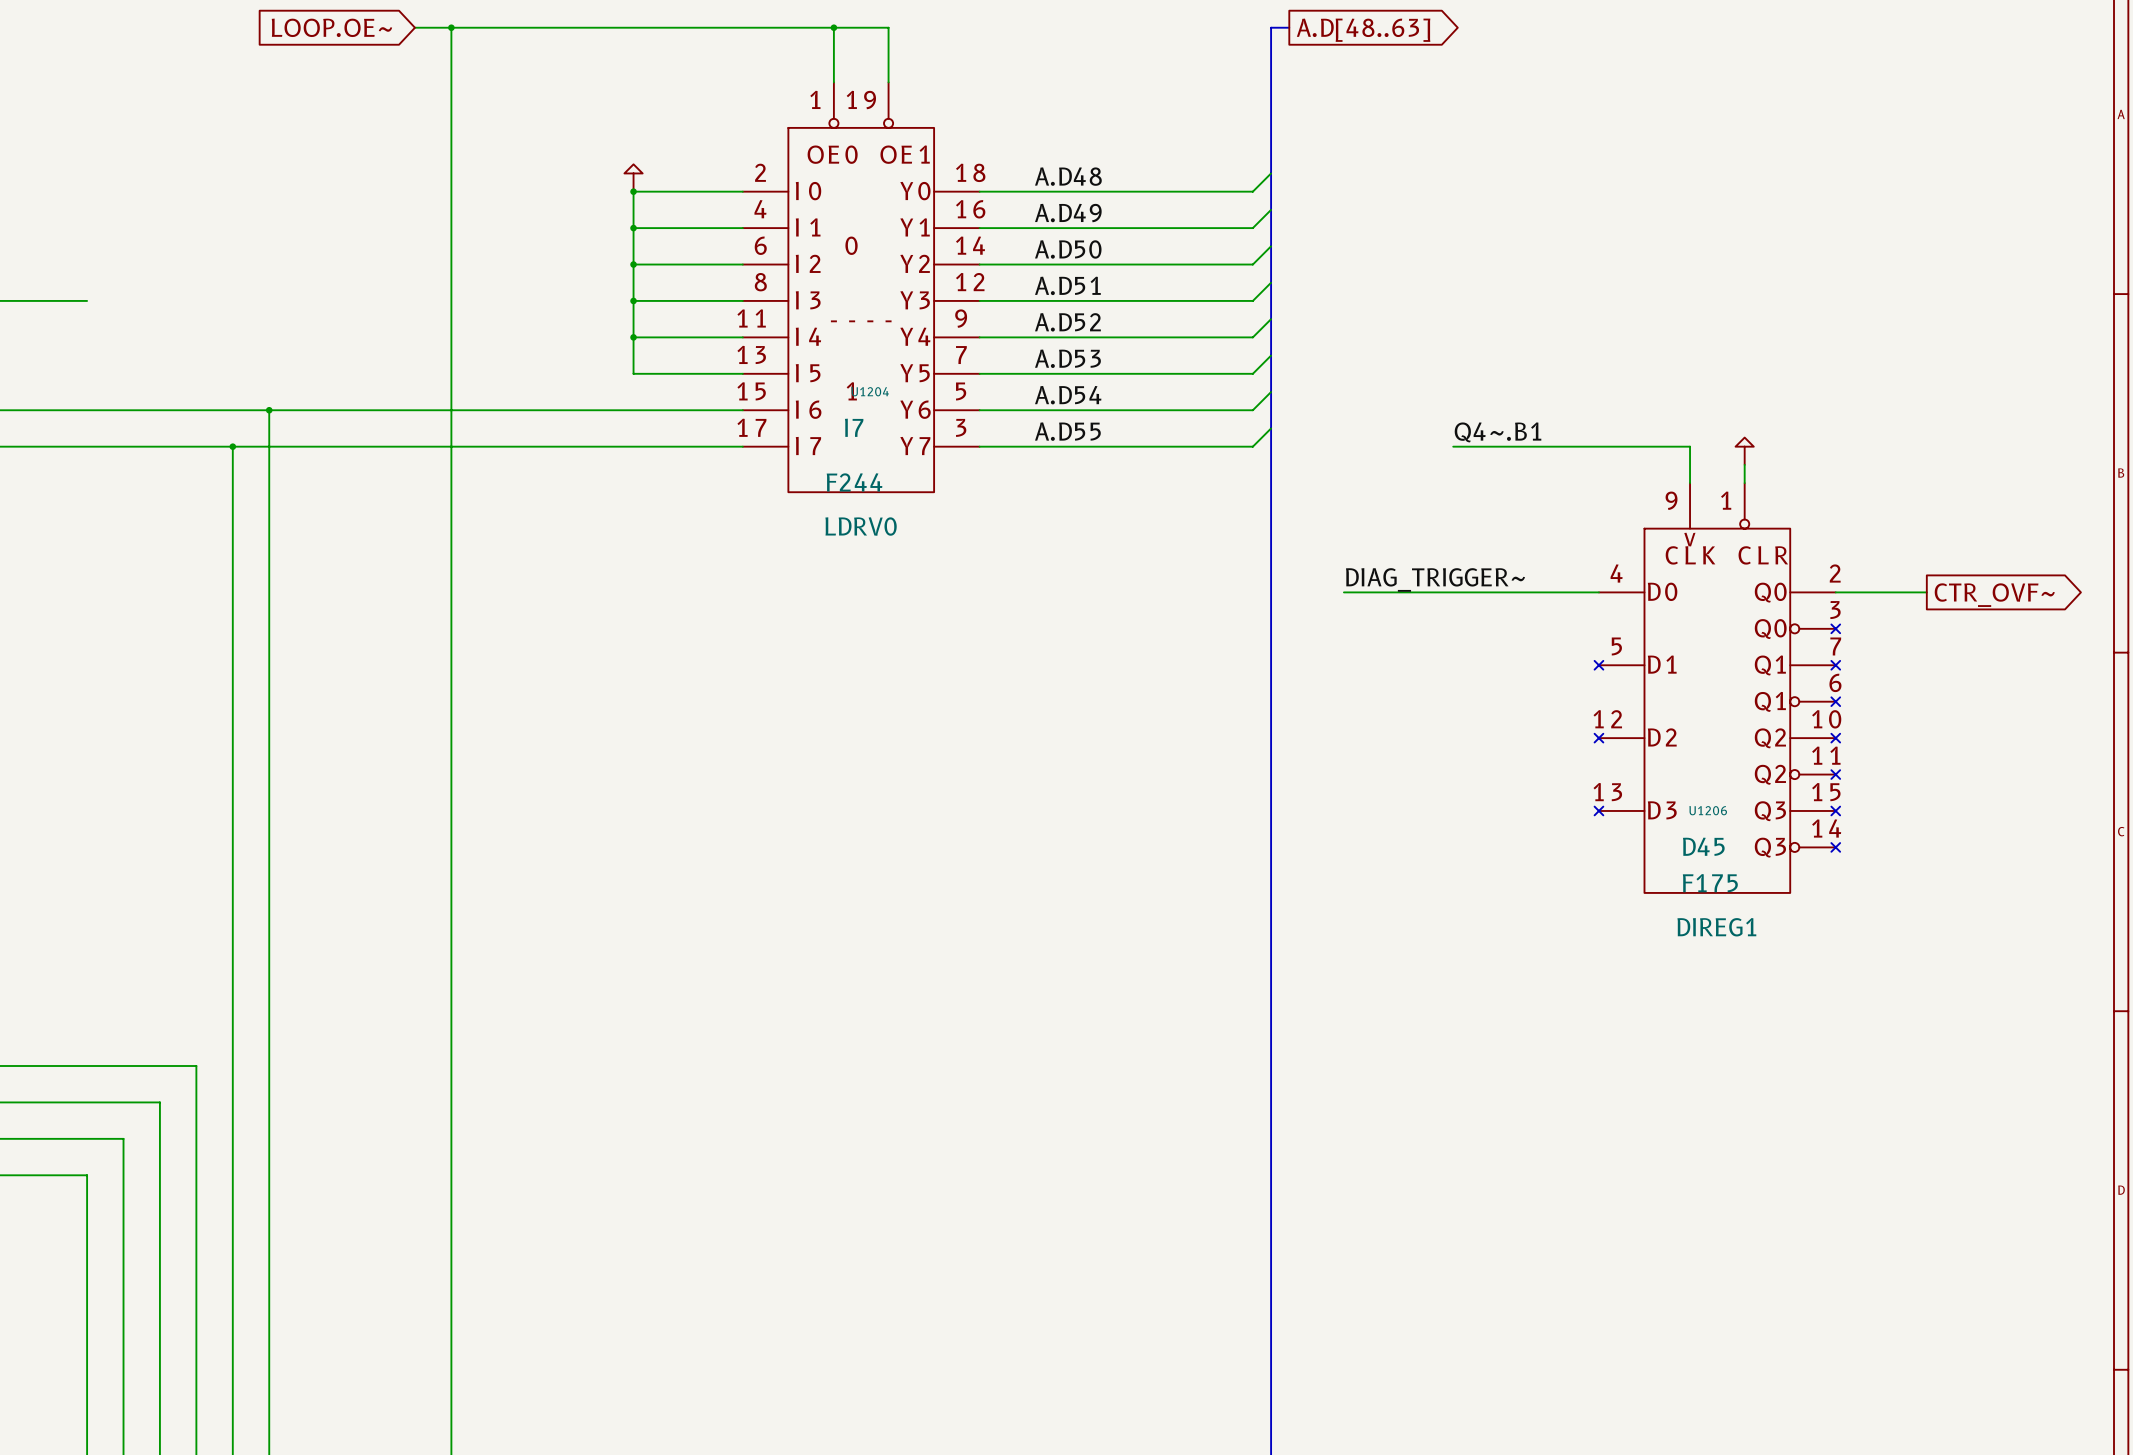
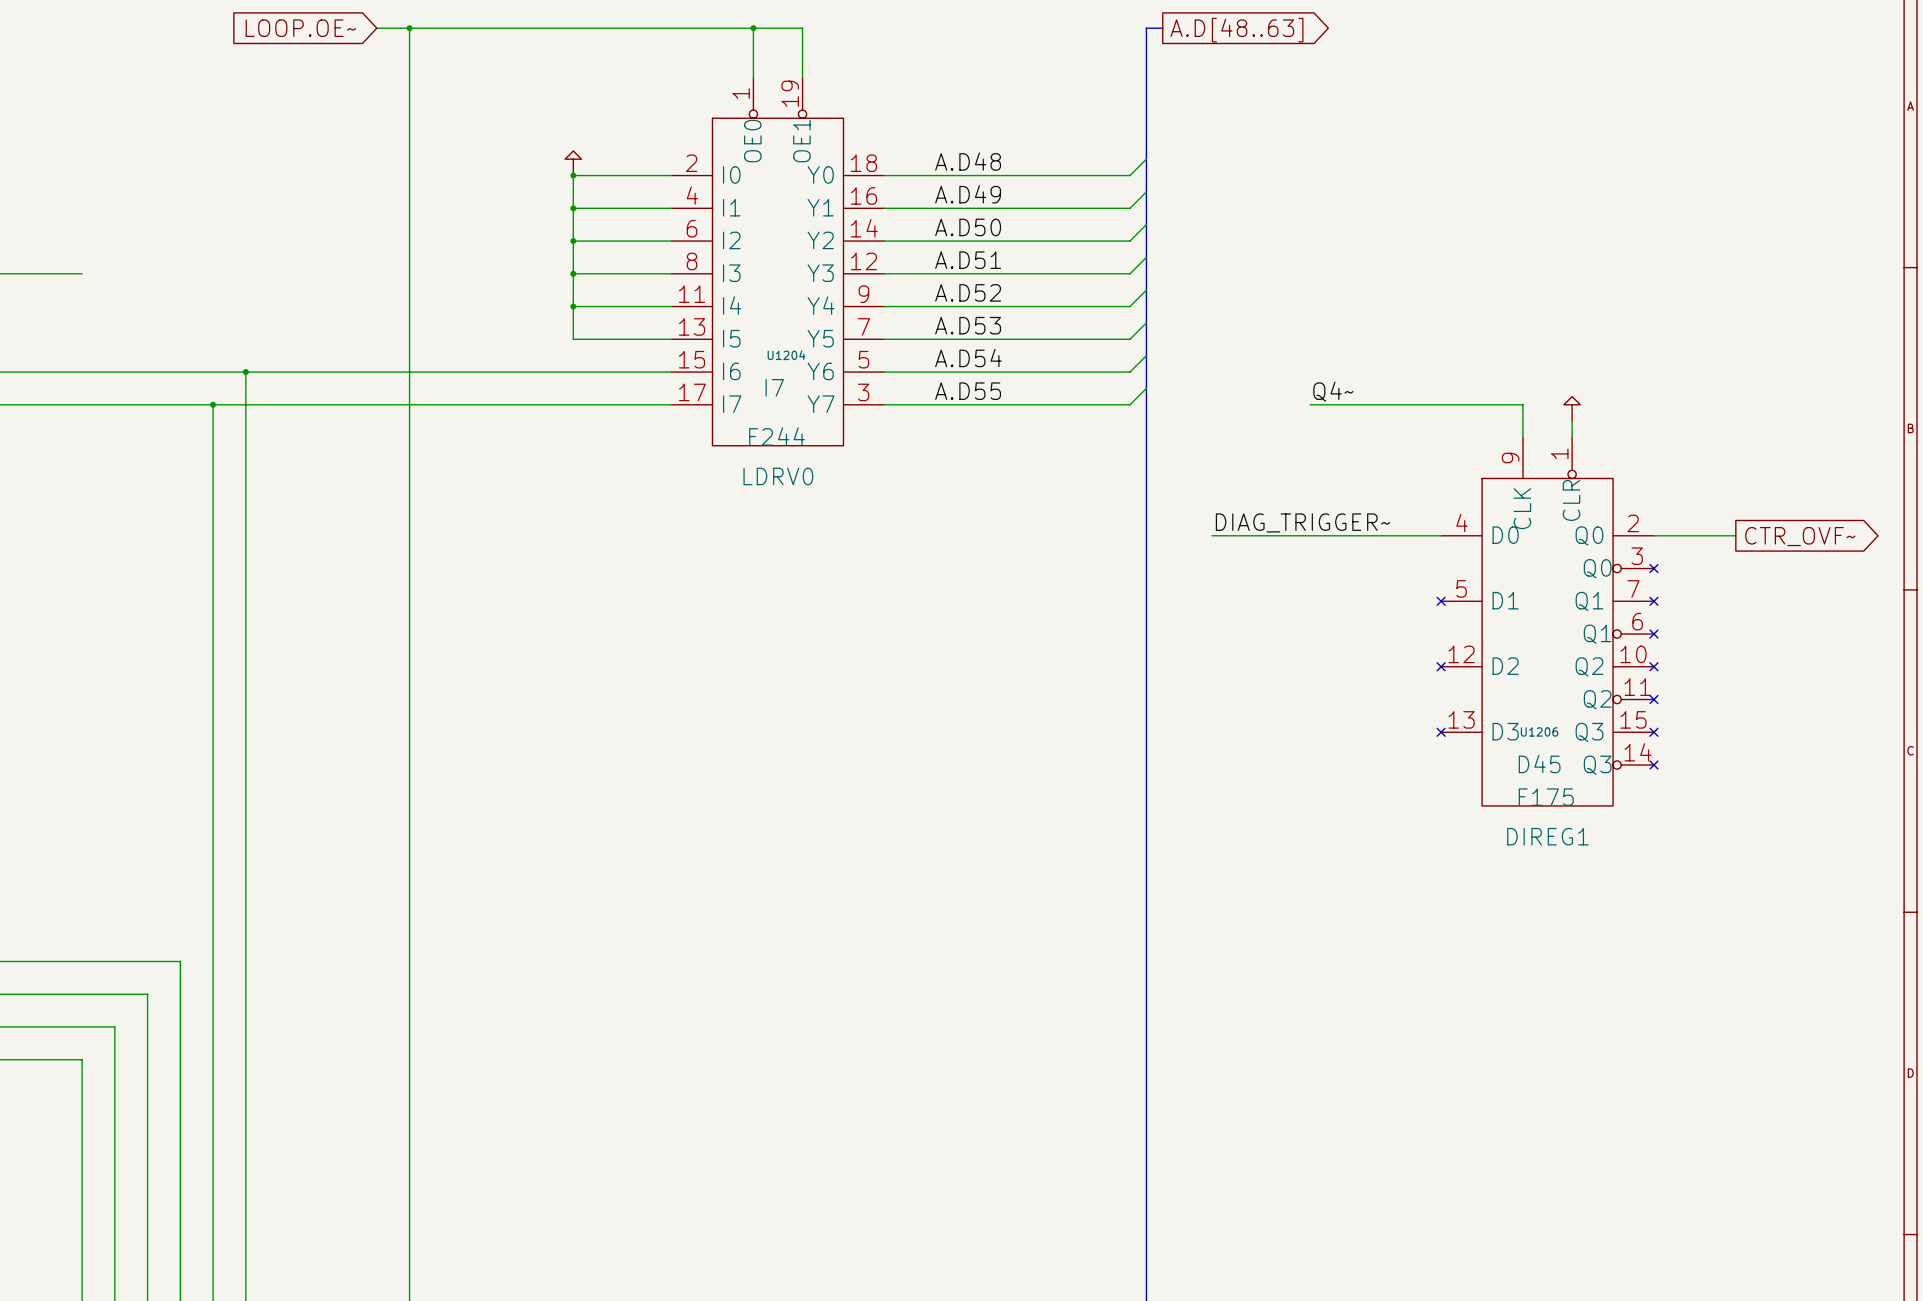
U1204 symbol: [742, 82, 980, 493] -> [671, 77, 885, 446]
label: Q4~.B1 (1498, 432) -> Q4~ (1333, 391)
U1206 symbol: [1598, 483, 1836, 893] -> [1441, 437, 1654, 806]

